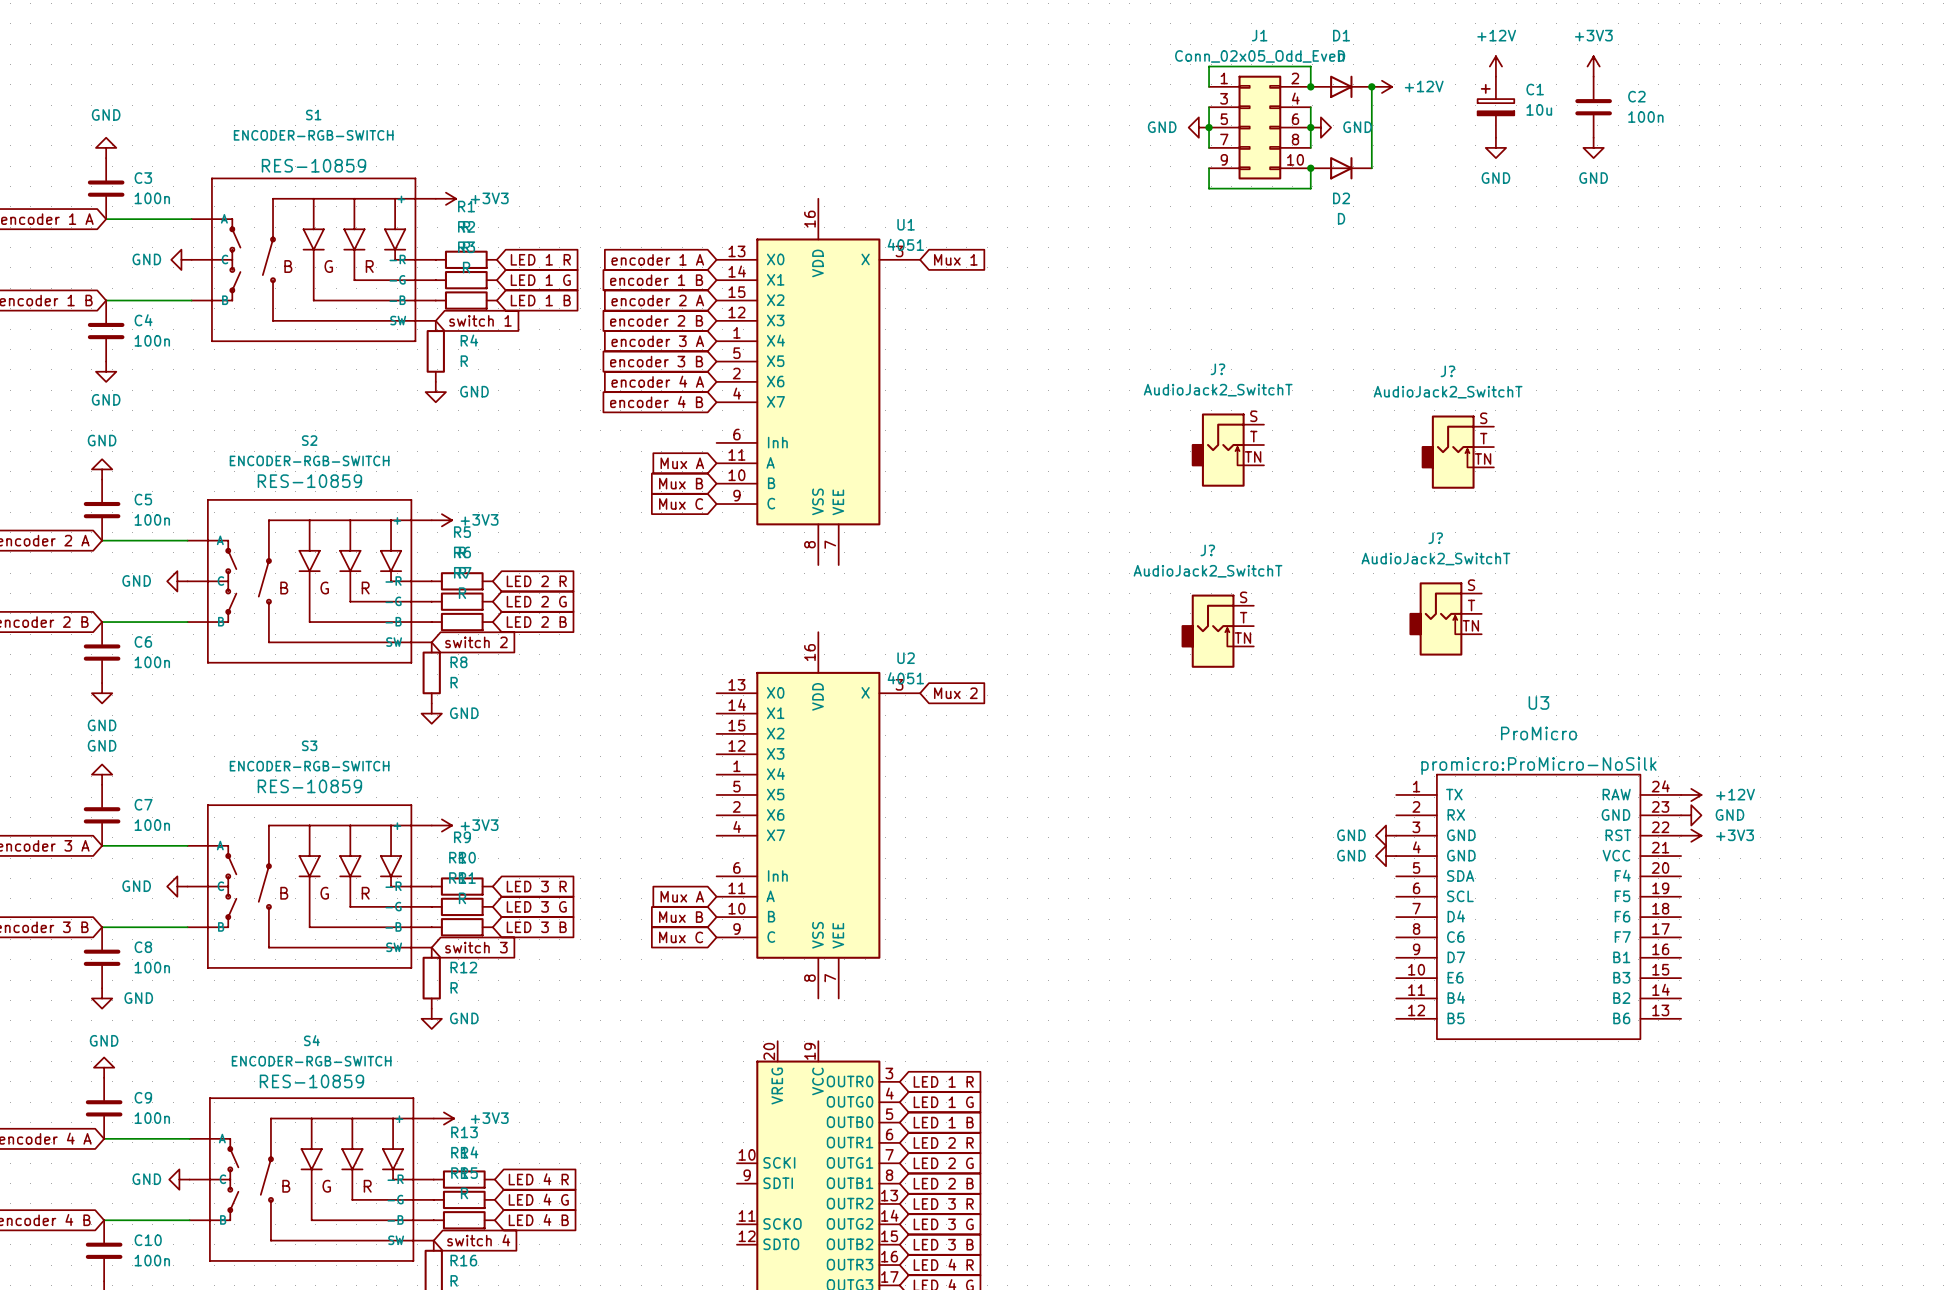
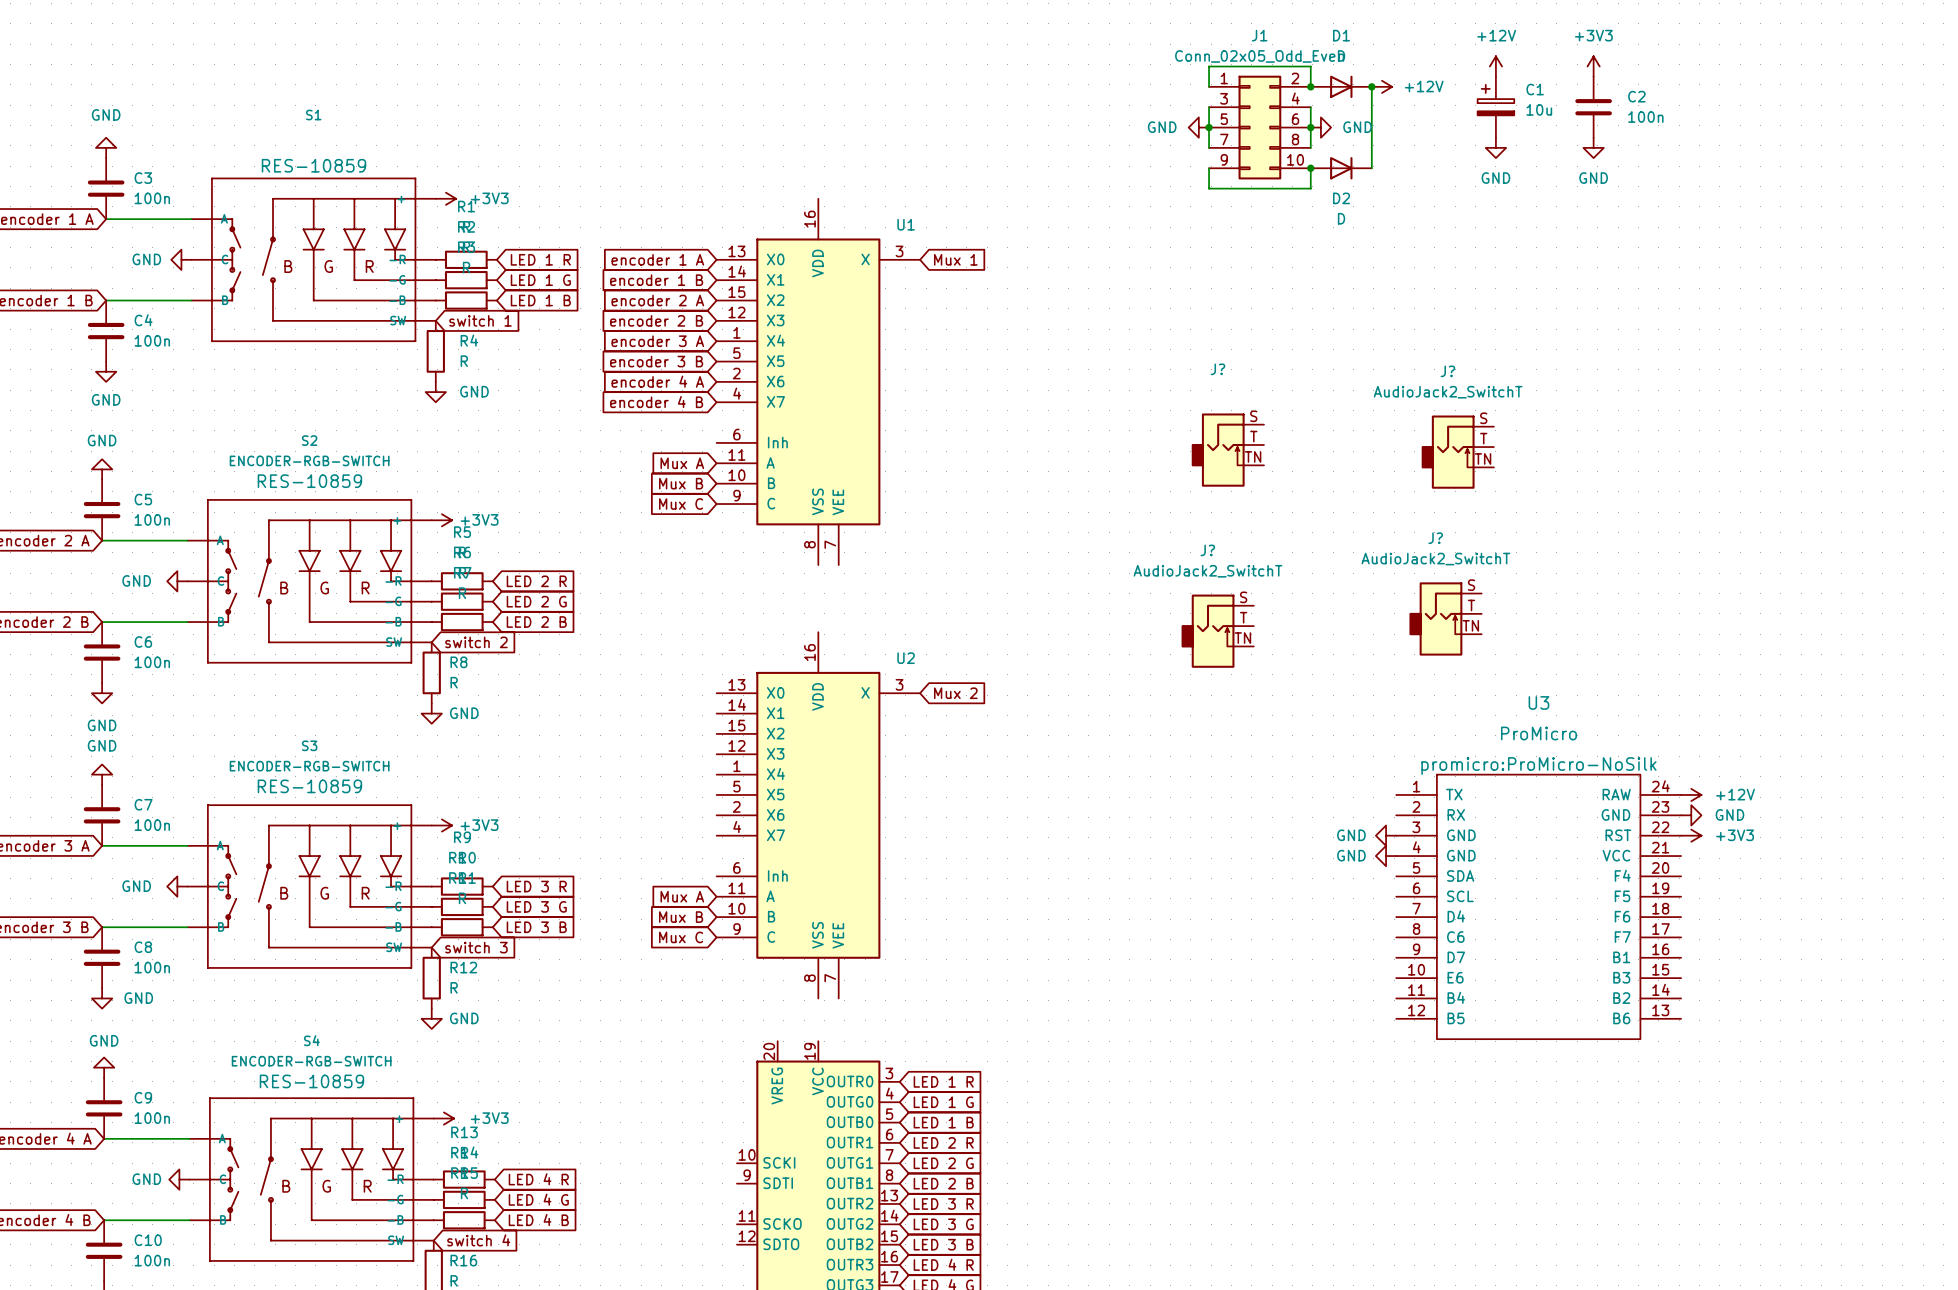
S1 value: ENCODER-RGB-SWITCH (313, 135) -> none
U1 value: 4051 (905, 244) -> none
J? value: AudioJack2_SwitchT (1218, 390) -> none
U2 value: 4051 (905, 678) -> none

